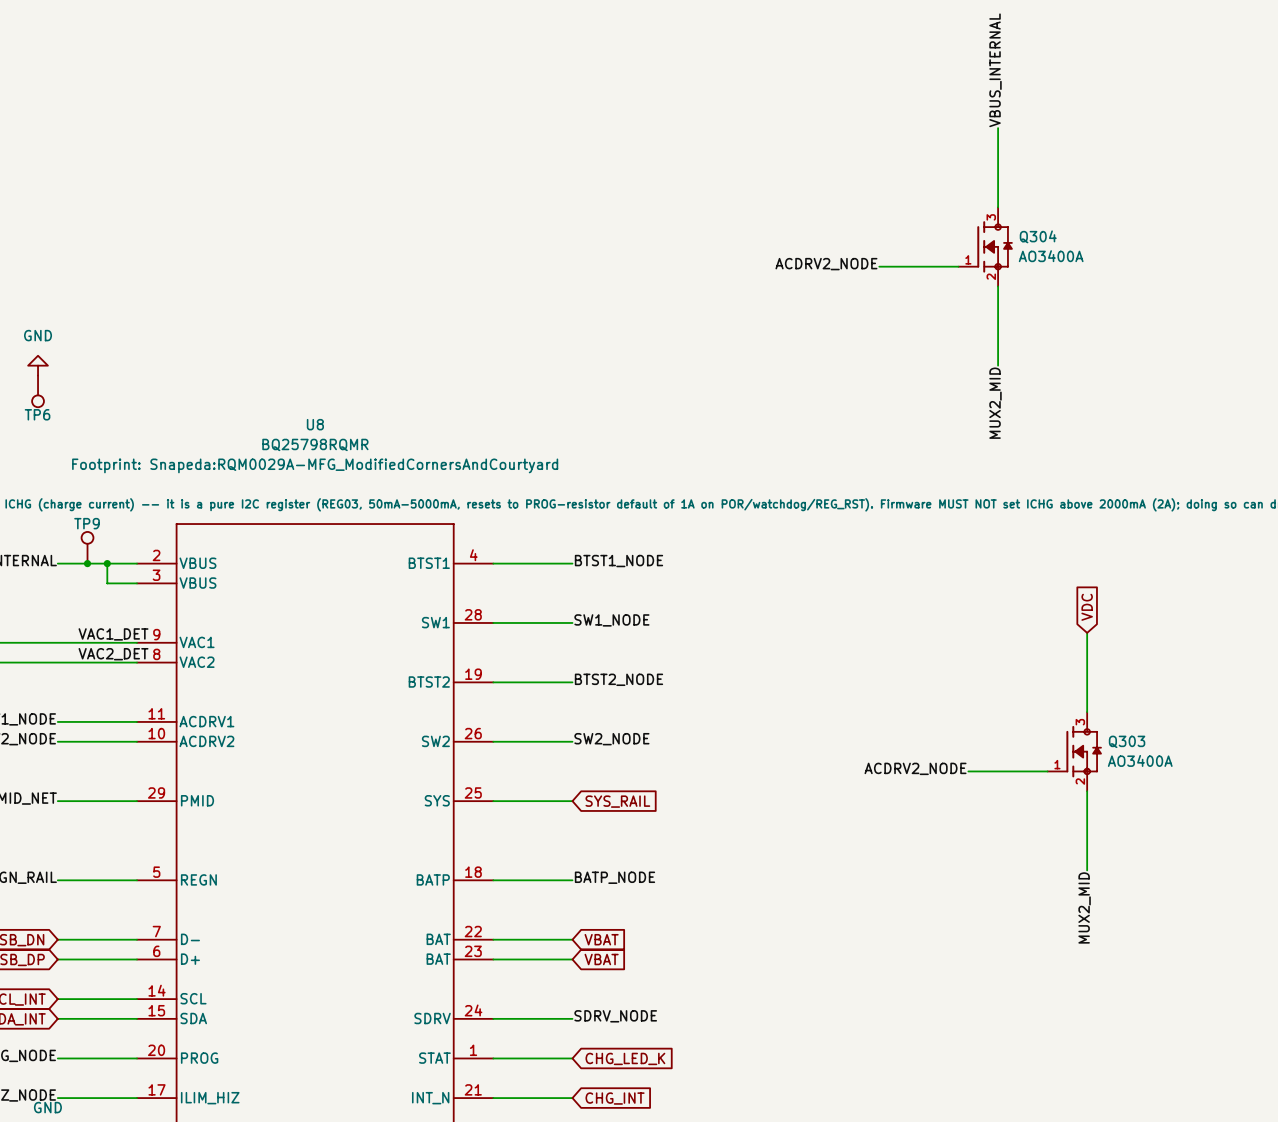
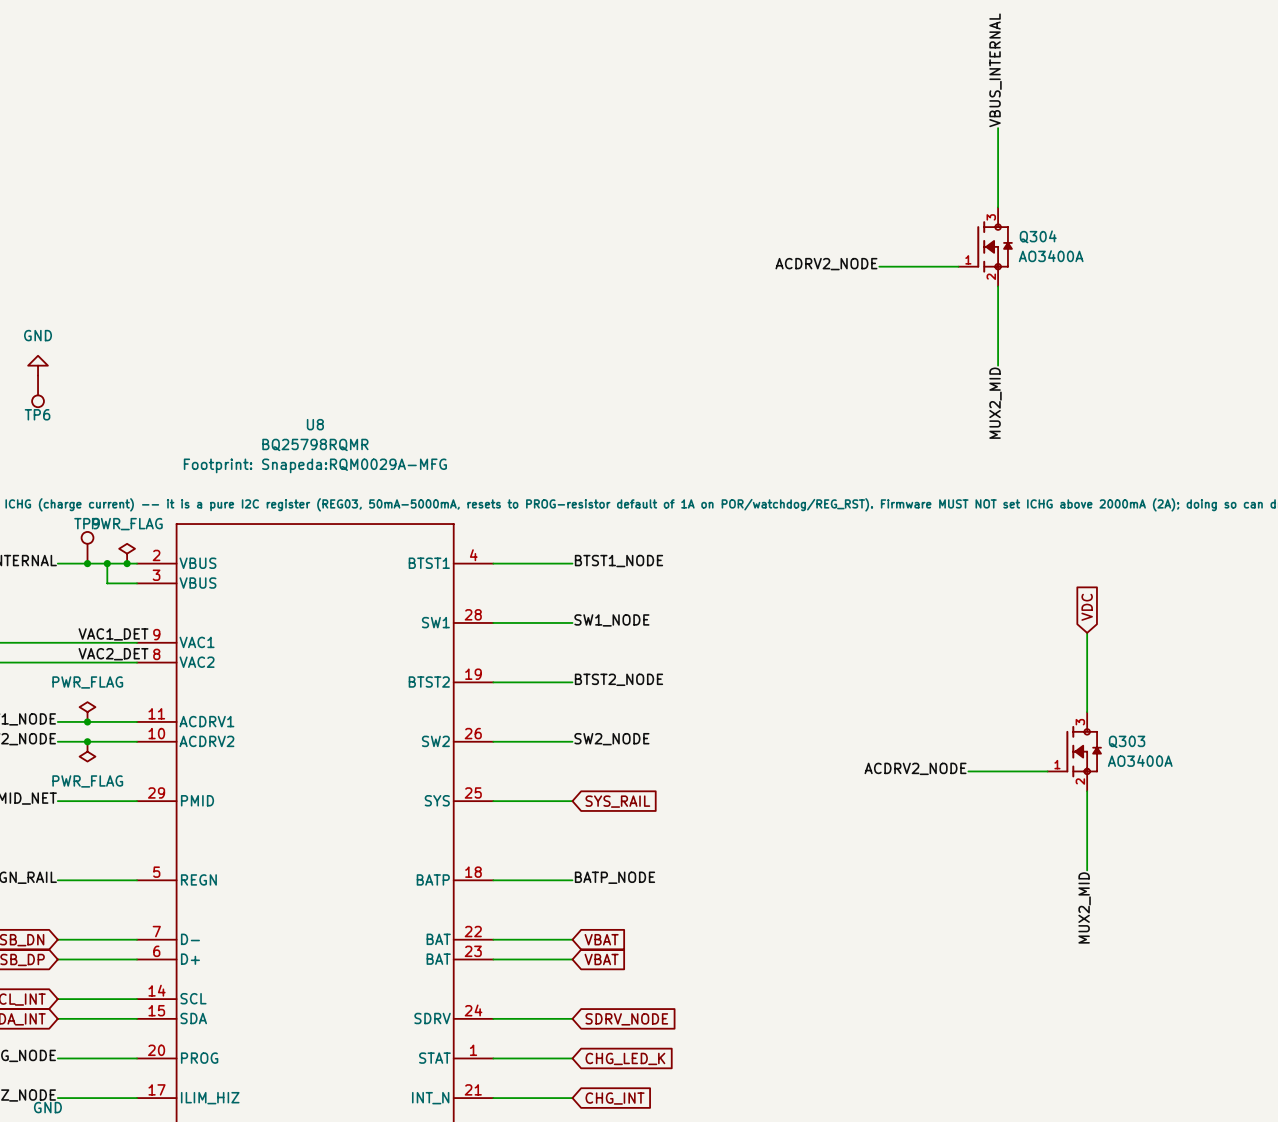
U8 text: Footprint: Snapeda:RQM0029A-MFG_ModifiedCornersAndCourtyard (315, 465) -> Footprint: Snapeda:RQM0029A-MFG (315, 465)
power symbol: none -> PWR_FLAG (127, 553)
junction: none -> (127, 563)
power symbol: none -> PWR_FLAG (87, 712)
junction: none -> (87, 721)
junction: none -> (87, 741)
power symbol: none -> PWR_FLAG (87, 751)
label: SDRV_NODE (615, 1016) -> none
global label: none -> SDRV_NODE (626, 1019)

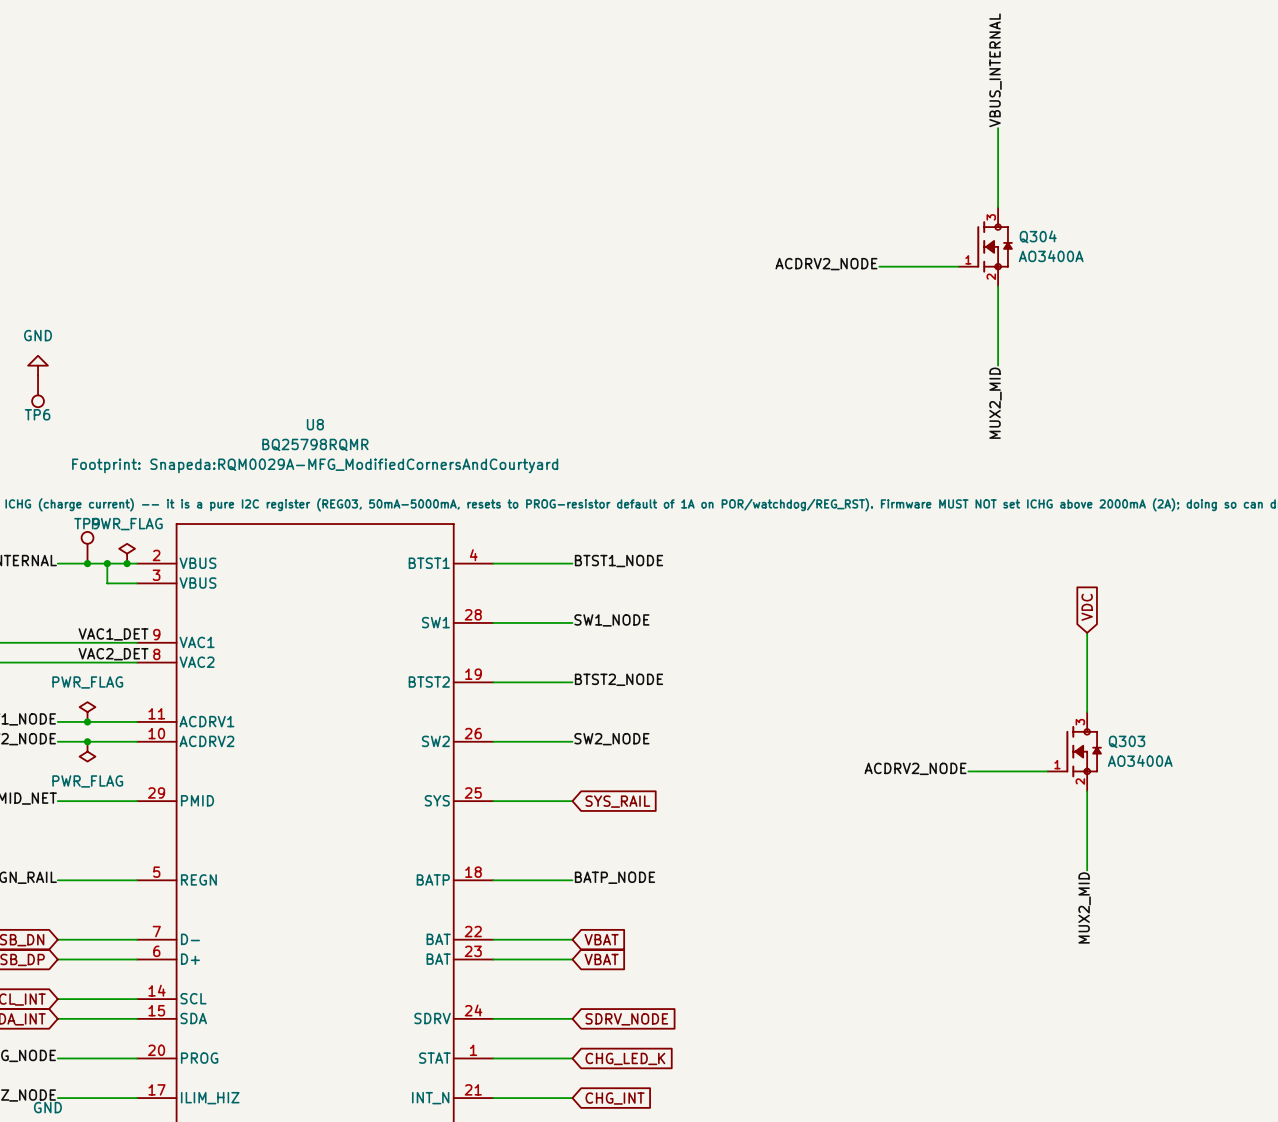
U8 text: Footprint: Snapeda:RQM0029A-MFG (315, 465) -> Footprint: Snapeda:RQM0029A-MFG_ModifiedCornersAndCourtyard (315, 465)

